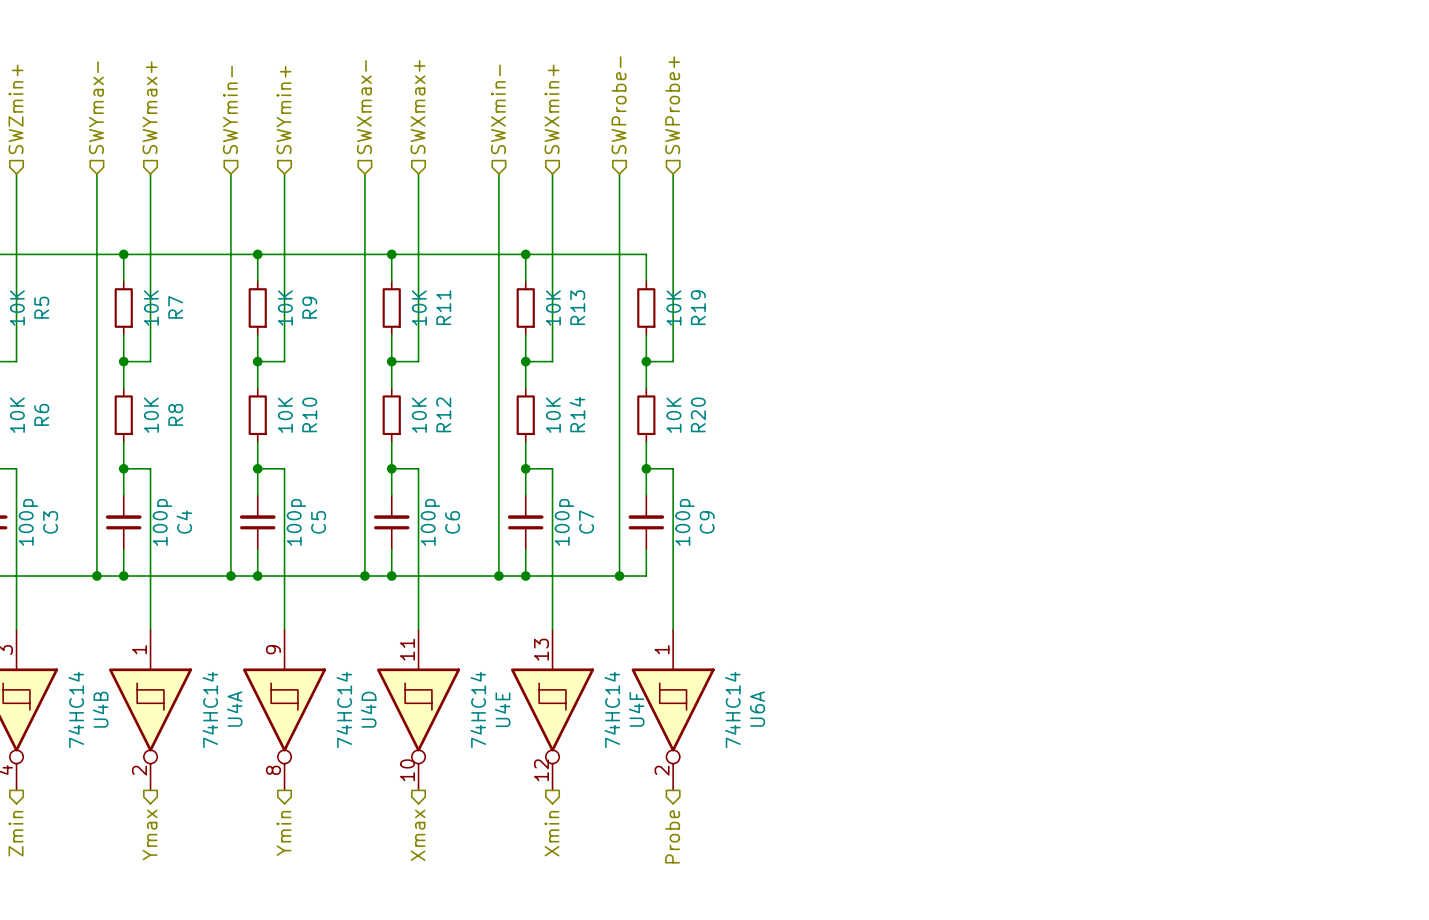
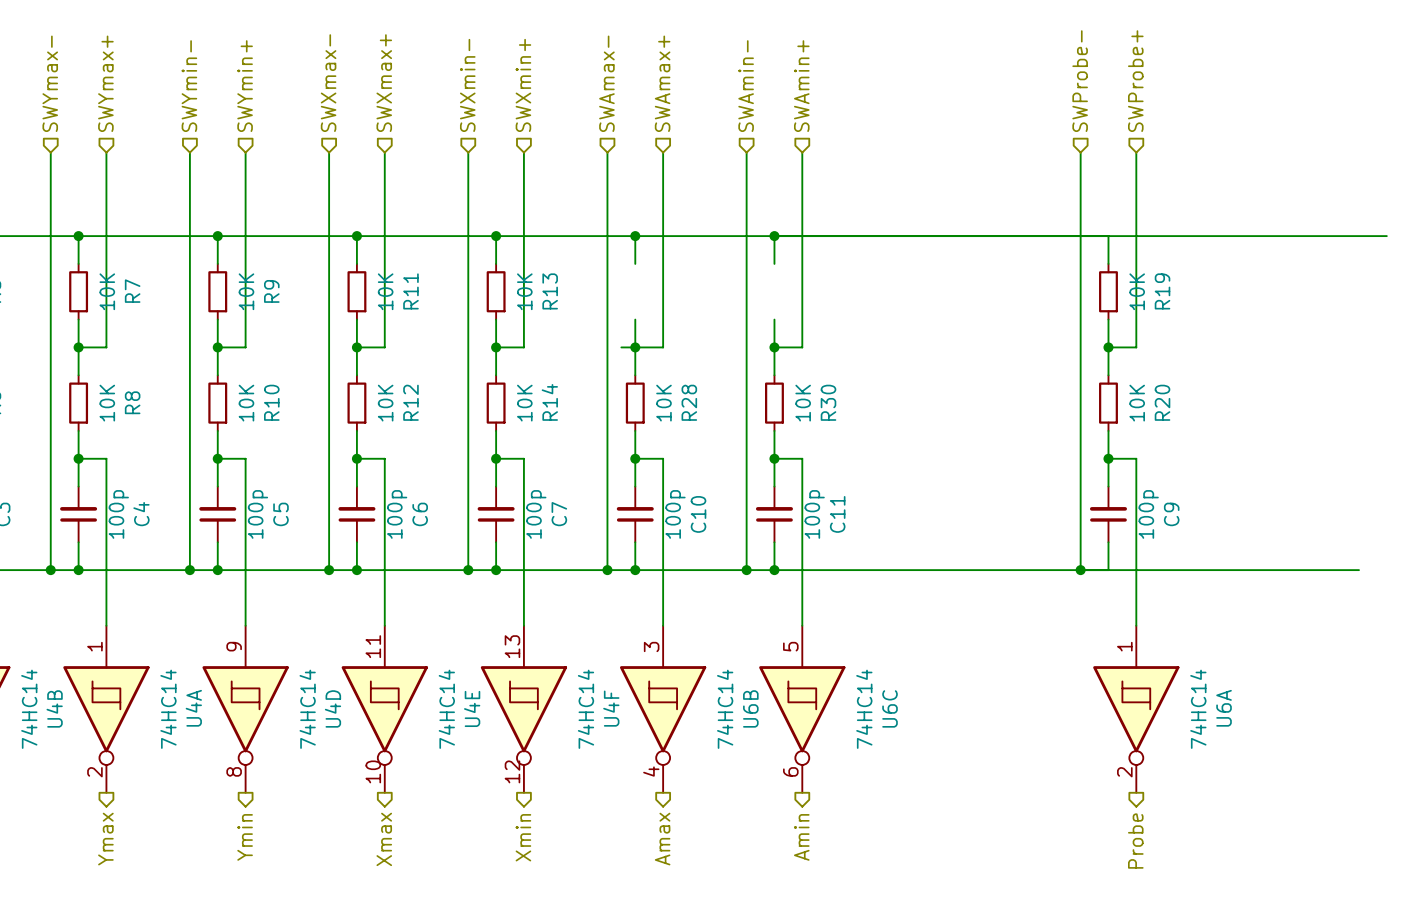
hierarchical label: SWProbe- (619, 105) -> none
hierarchical label: SWProbe+ (672, 105) -> none
hierarchical label: none -> SWProbe- (1080, 81)
hierarchical label: none -> SWProbe+ (1135, 81)
hierarchical label: none -> SWAmax- (606, 83)
hierarchical label: none -> SWAmax+ (662, 83)
hierarchical label: none -> SWAmin- (746, 86)
hierarchical label: none -> SWAmin+ (801, 86)
wire: (619, 174) (619, 576) -> (607, 152) (607, 570)
wire: (673, 174) (673, 361) -> (663, 152) (663, 347) (649, 347)
wire: none -> (746, 152) (746, 570)
wire: none -> (802, 152) (802, 347) (774, 347)
wire: none -> (1080, 152) (1080, 570)
wire: none -> (1136, 152) (1136, 347) (1108, 347)
wire: (646, 254) (646, 281) -> (621, 236) (1386, 236)
wire: none -> (635, 236) (635, 263)
junction: none -> (635, 236)
wire: none -> (774, 236) (774, 263)
junction: none -> (774, 236)
wire: none -> (1108, 236) (1108, 263)
R19 position: (646, 308) -> (1108, 291)
wire: (646, 334) (646, 388) -> (635, 319) (635, 375)
wire: none -> (774, 319) (774, 375)
wire: none -> (1108, 319) (1108, 375)
junction position: (646, 361) -> (635, 347)
junction: none -> (774, 347)
junction: none -> (1108, 347)
R20 position: (646, 415) -> (1108, 403)
R28: none -> 10K (635, 403)
R30: none -> 10K (774, 403)
wire: (646, 442) (646, 495) -> (635, 430) (635, 486)
wire: none -> (774, 430) (774, 486)
wire: none -> (1108, 430) (1108, 486)
wire: (646, 468) (659, 468) -> none
junction position: (646, 468) -> (635, 458)
wire: (673, 468) (673, 629) -> (649, 458) (663, 458) (663, 625)
wire: none -> (774, 458) (802, 458) (802, 625)
junction: none -> (774, 458)
wire: none -> (1108, 458) (1136, 458) (1136, 625)
junction: none -> (1108, 458)
C9 position: (646, 522) -> (1108, 514)
C10: none -> 100p (635, 514)
C11: none -> 100p (774, 514)
wire: (646, 549) (646, 576) -> (1358, 570) (621, 570)
wire: none -> (635, 542) (635, 570)
wire: none -> (774, 542) (774, 570)
wire: none -> (1108, 542) (1108, 570)
junction position: (619, 576) -> (607, 570)
junction: none -> (635, 570)
junction: none -> (746, 570)
junction: none -> (774, 570)
junction: none -> (1080, 570)
U6A position: (673, 710) -> (1136, 709)
U6B: none -> 74HC14 (663, 709)
U6C: none -> 74HC14 (802, 709)
hierarchical label: none -> Amin (801, 837)
hierarchical label: none -> Amax (662, 839)
hierarchical label: Probe (672, 836) -> none
hierarchical label: none -> Probe (1135, 841)

